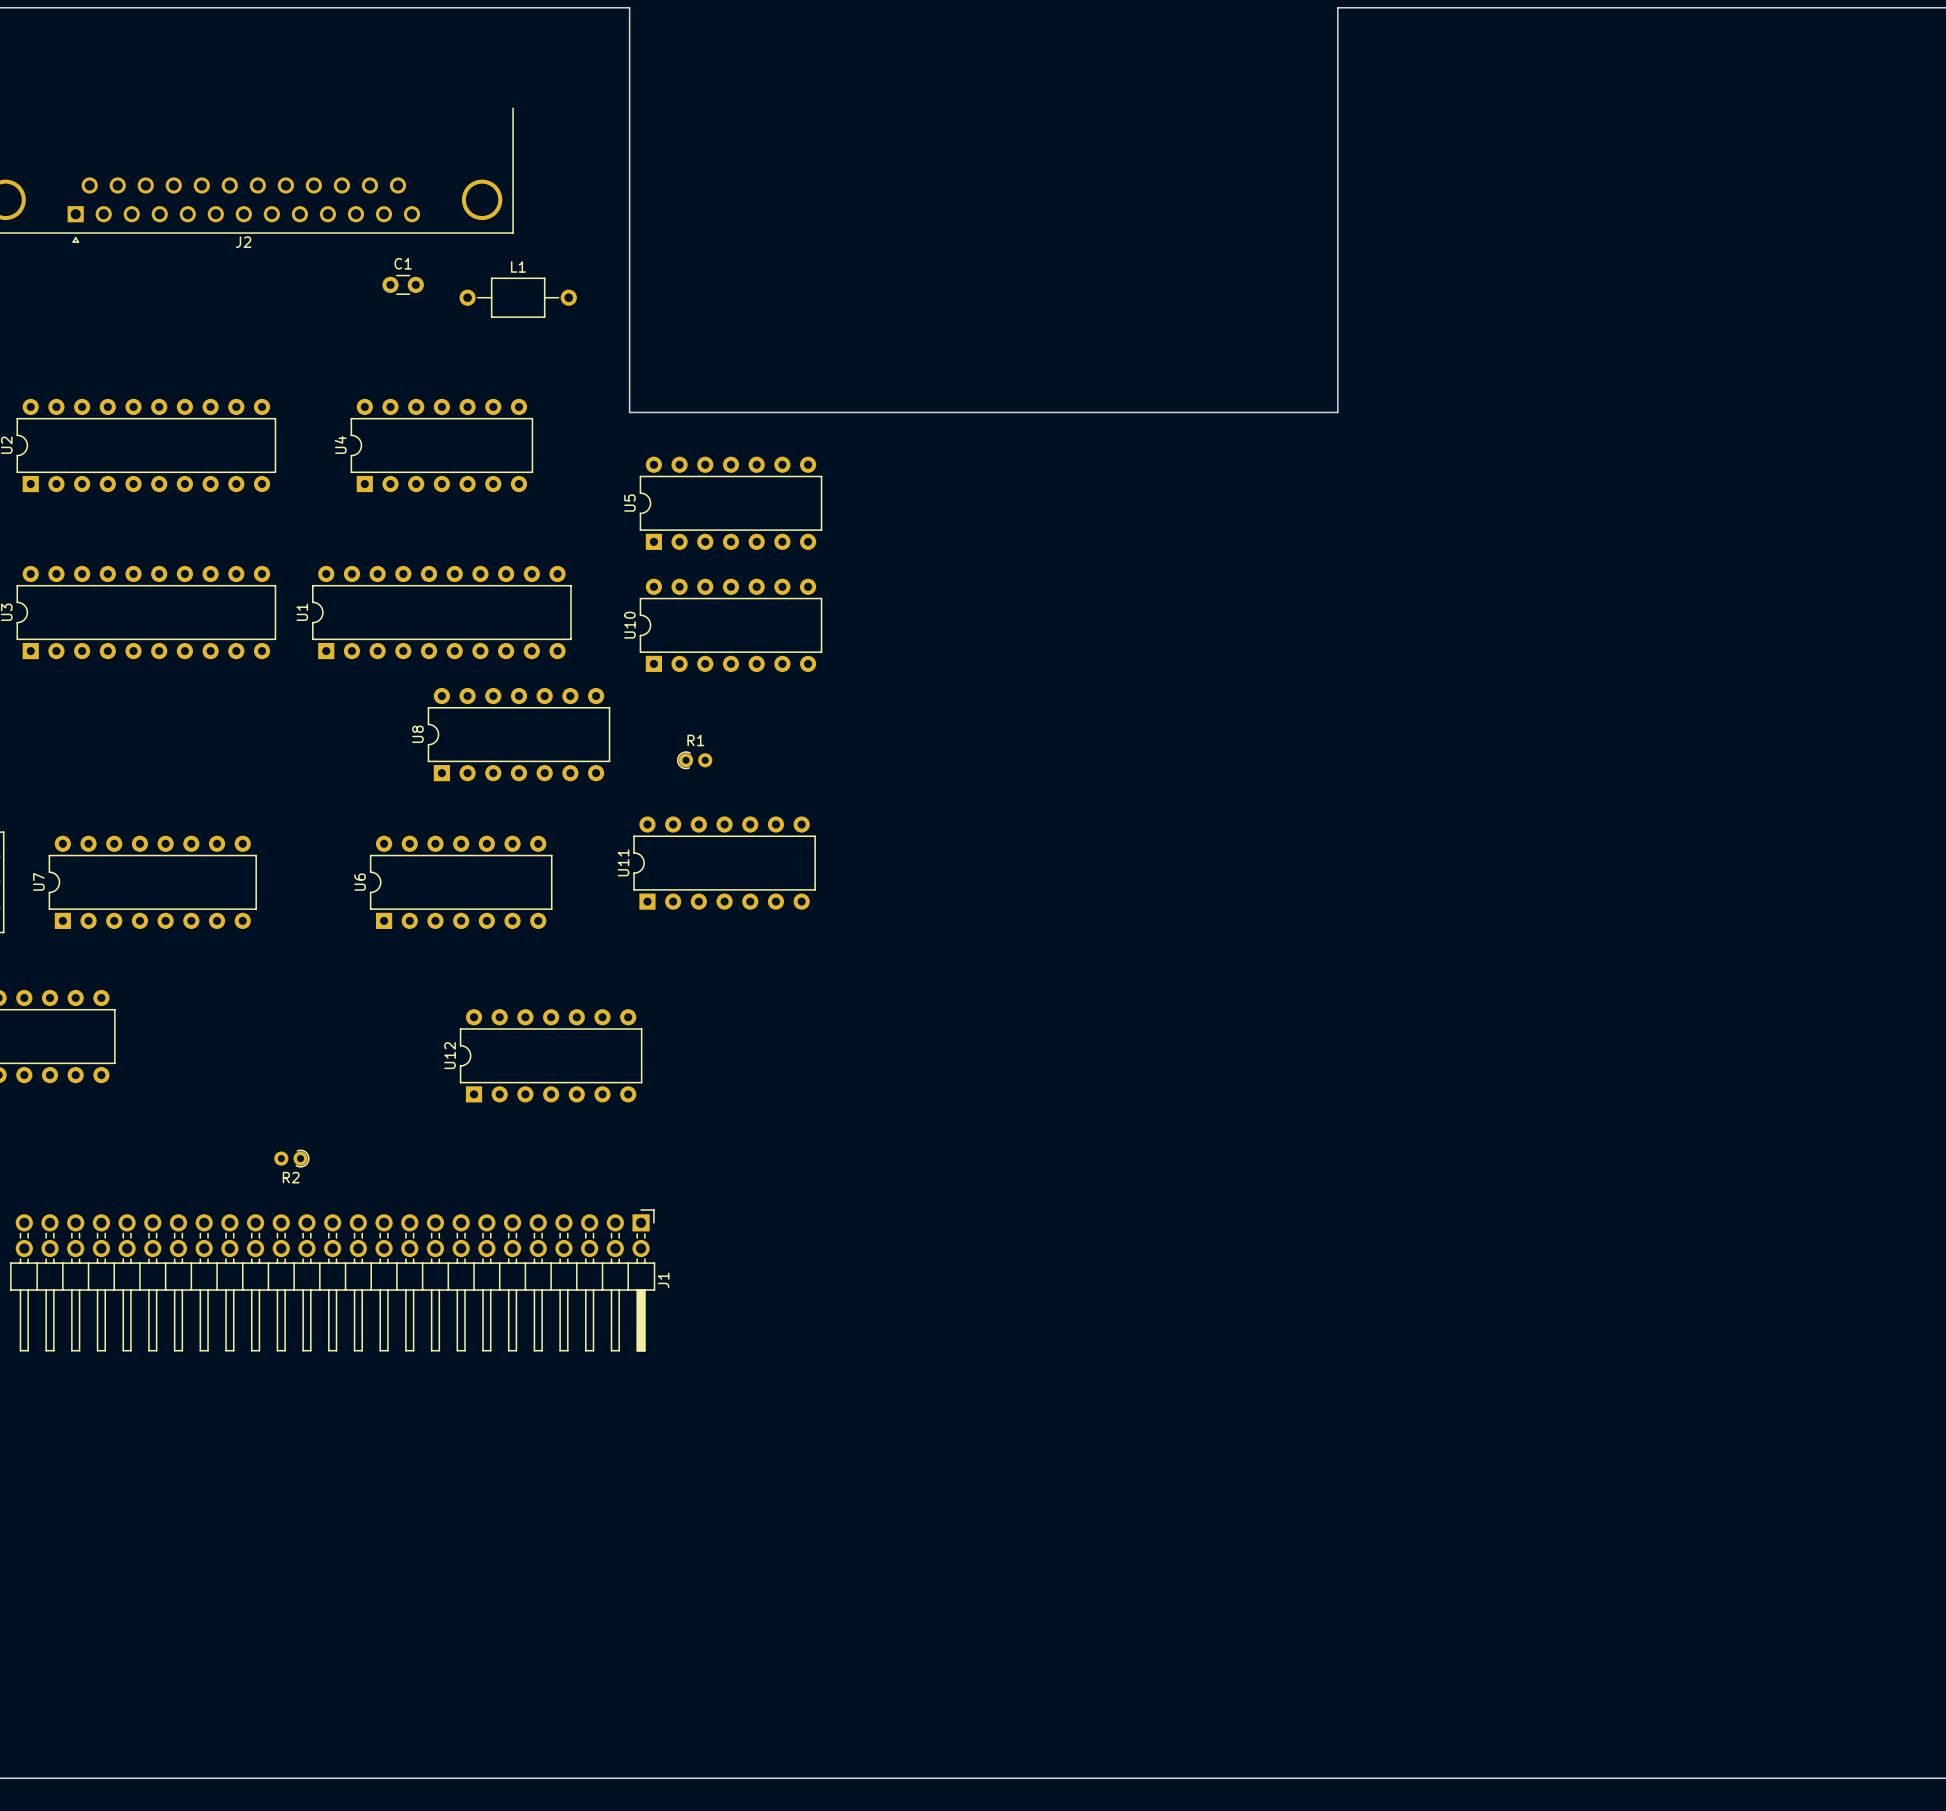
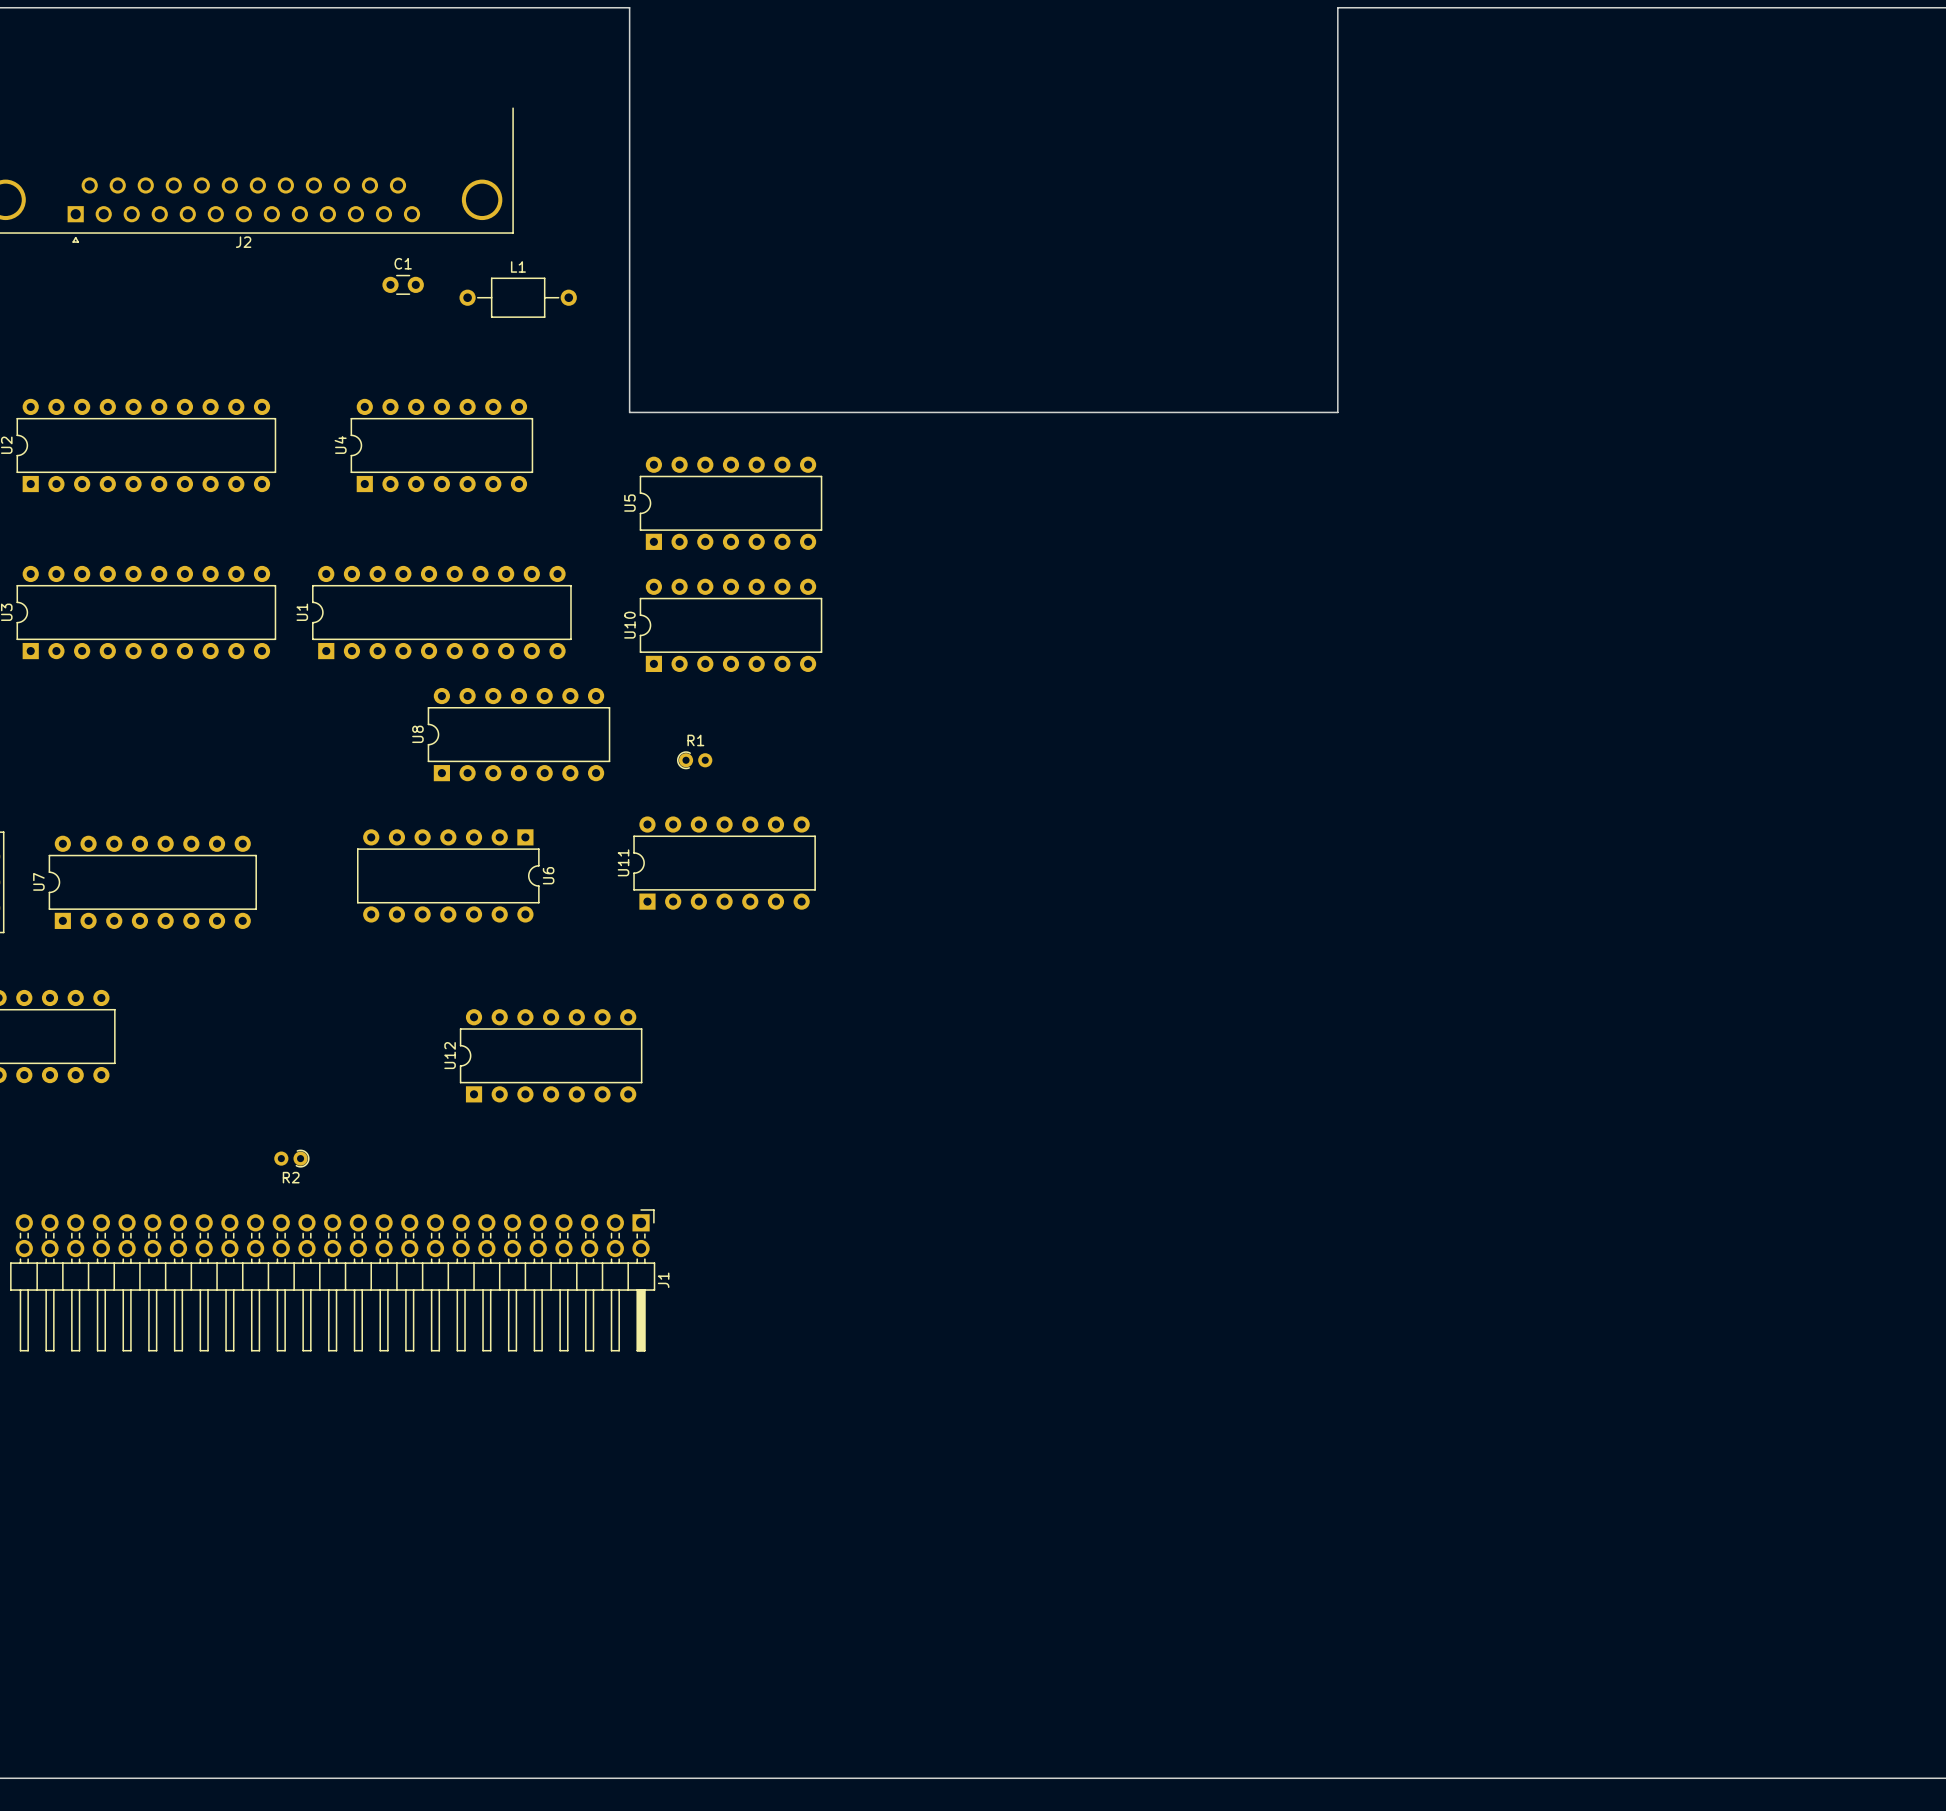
U6 rotation: 0° (461, 882) -> 180° (448, 875)

